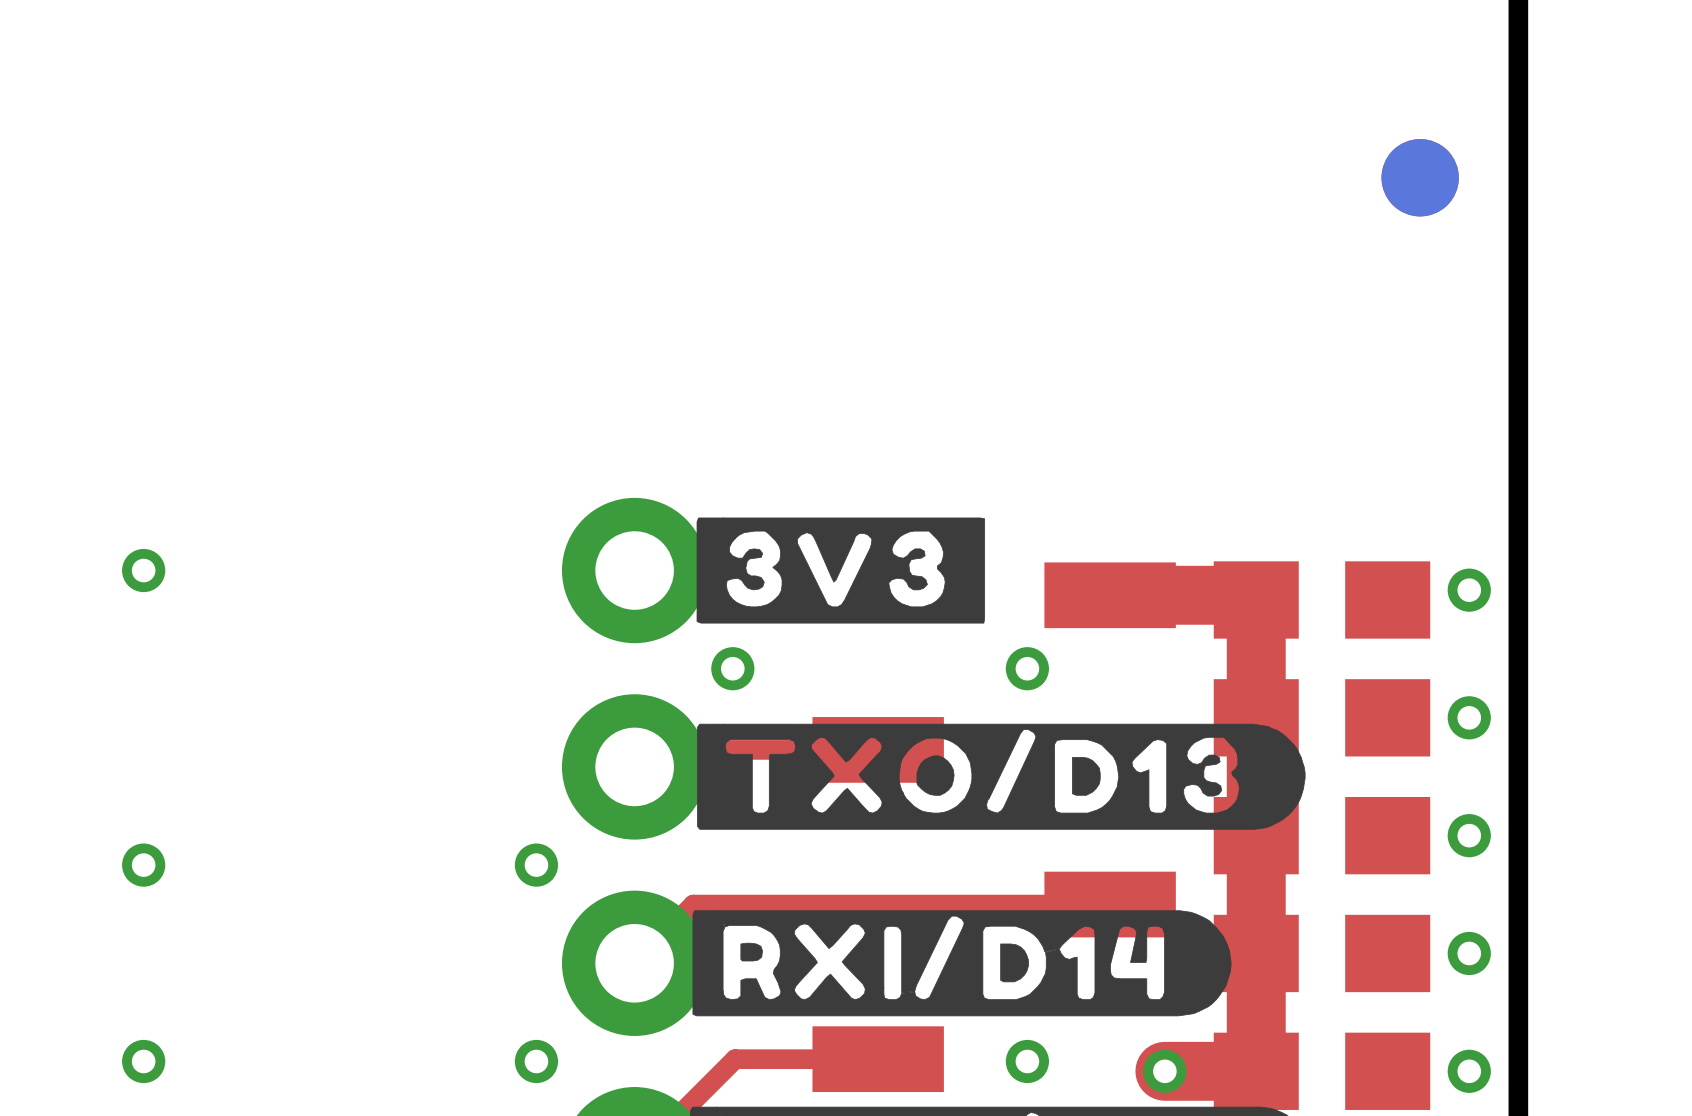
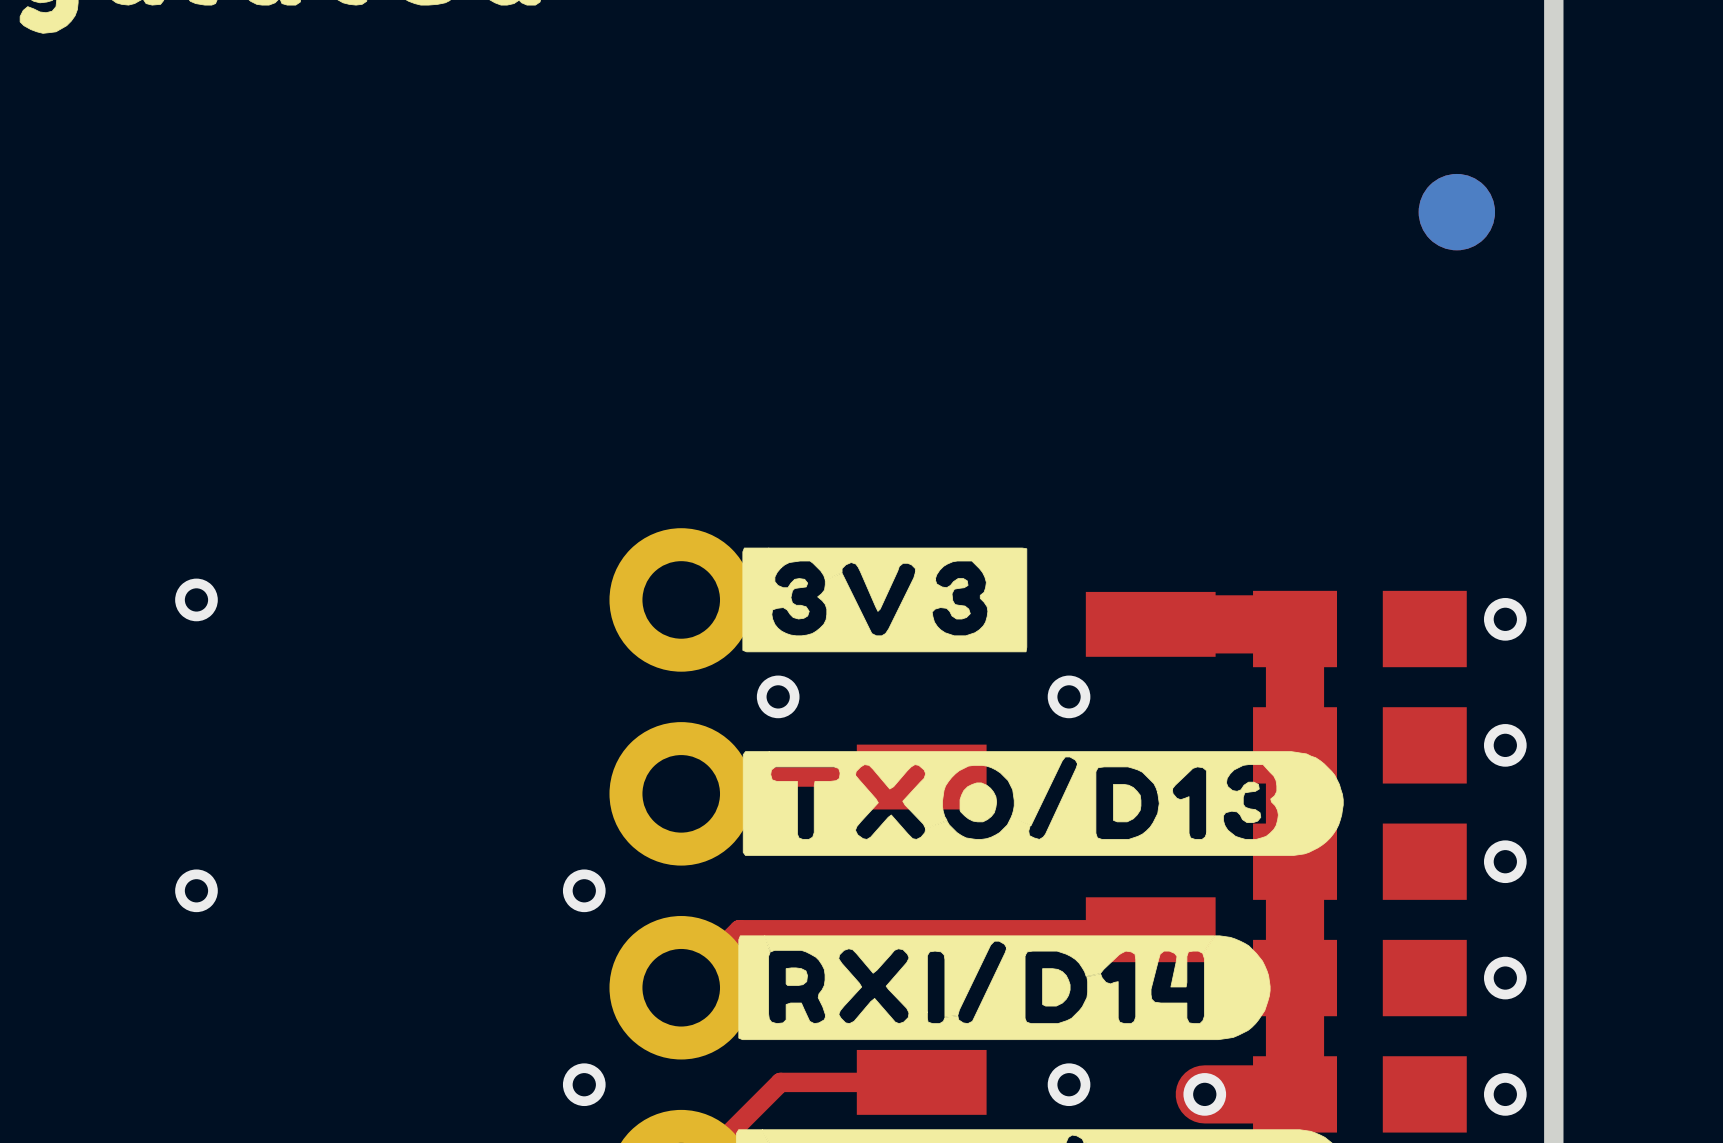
via: (143, 1061) -> none

